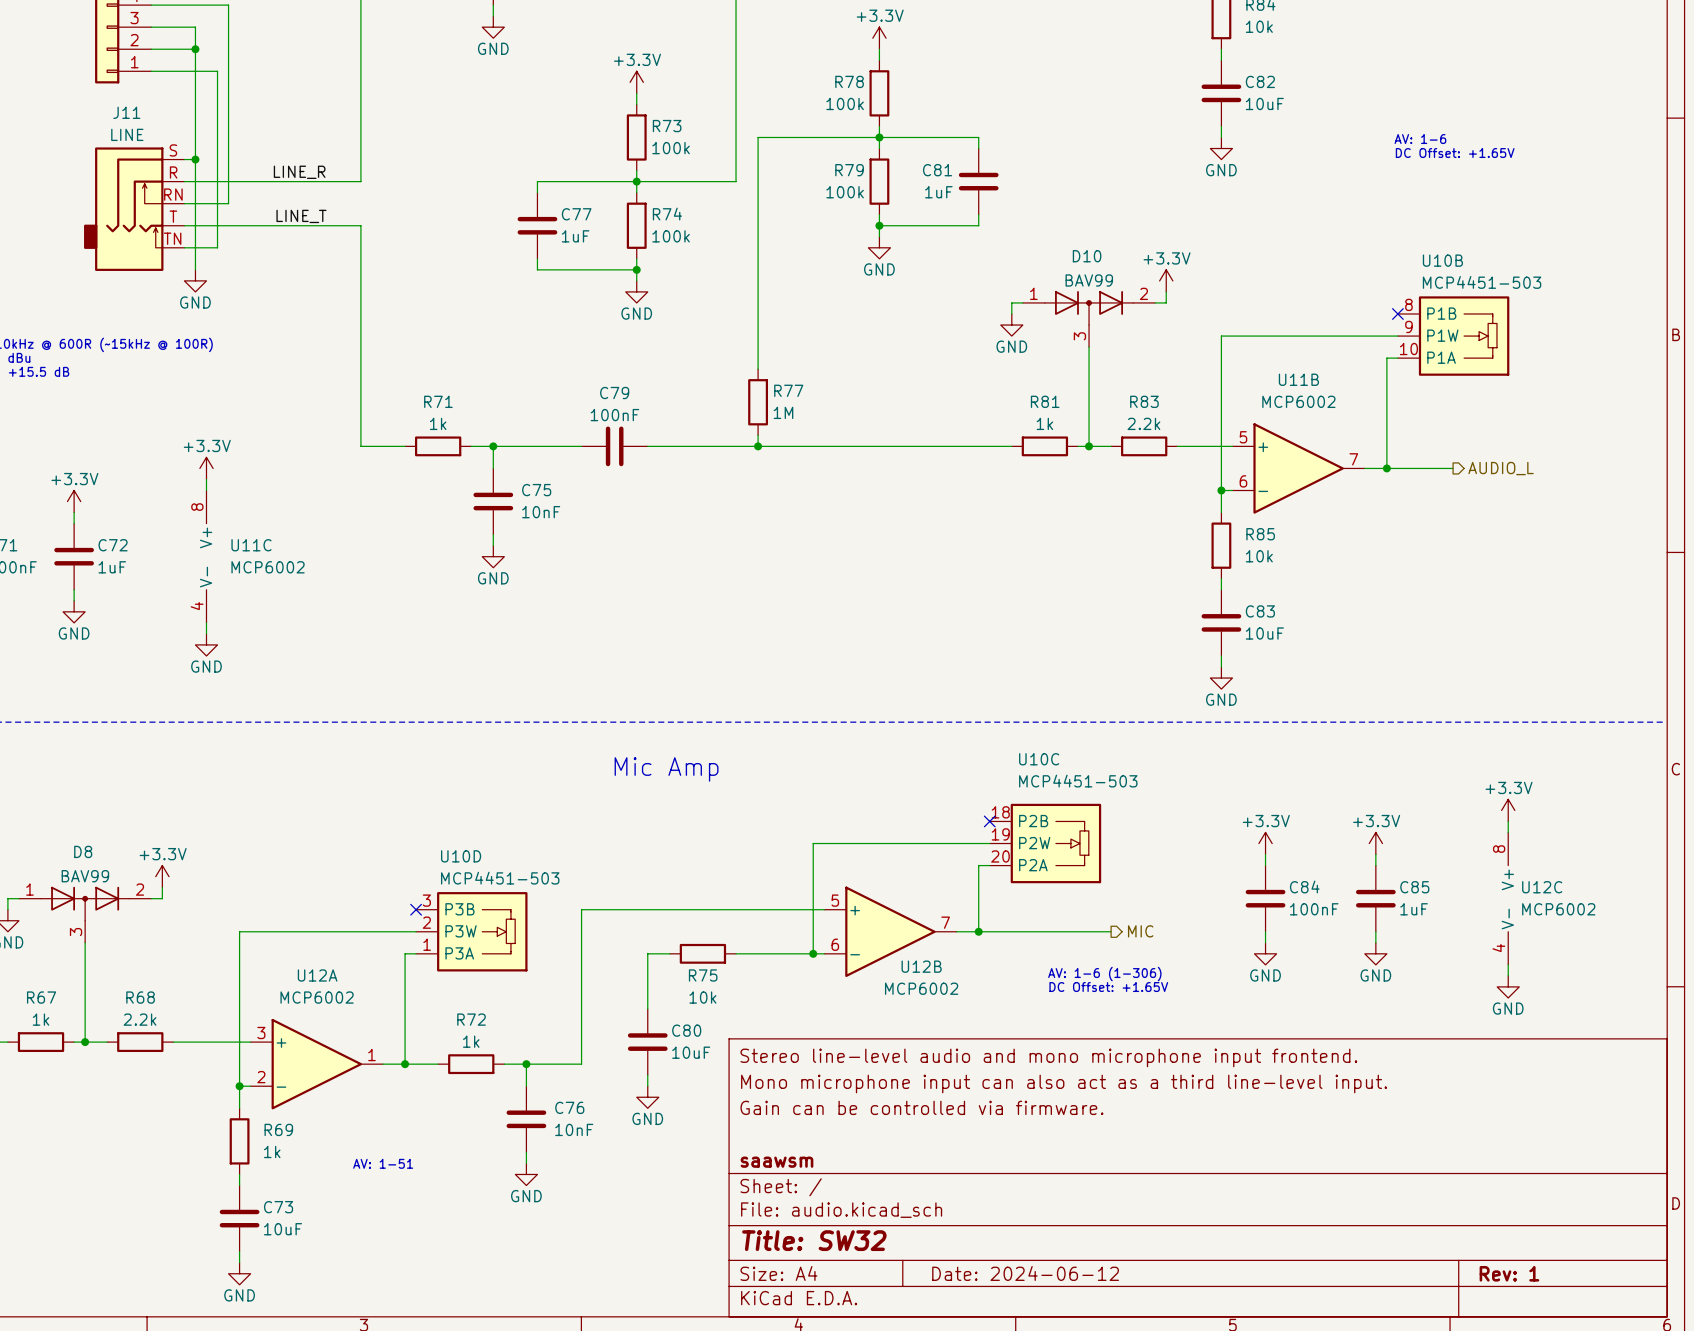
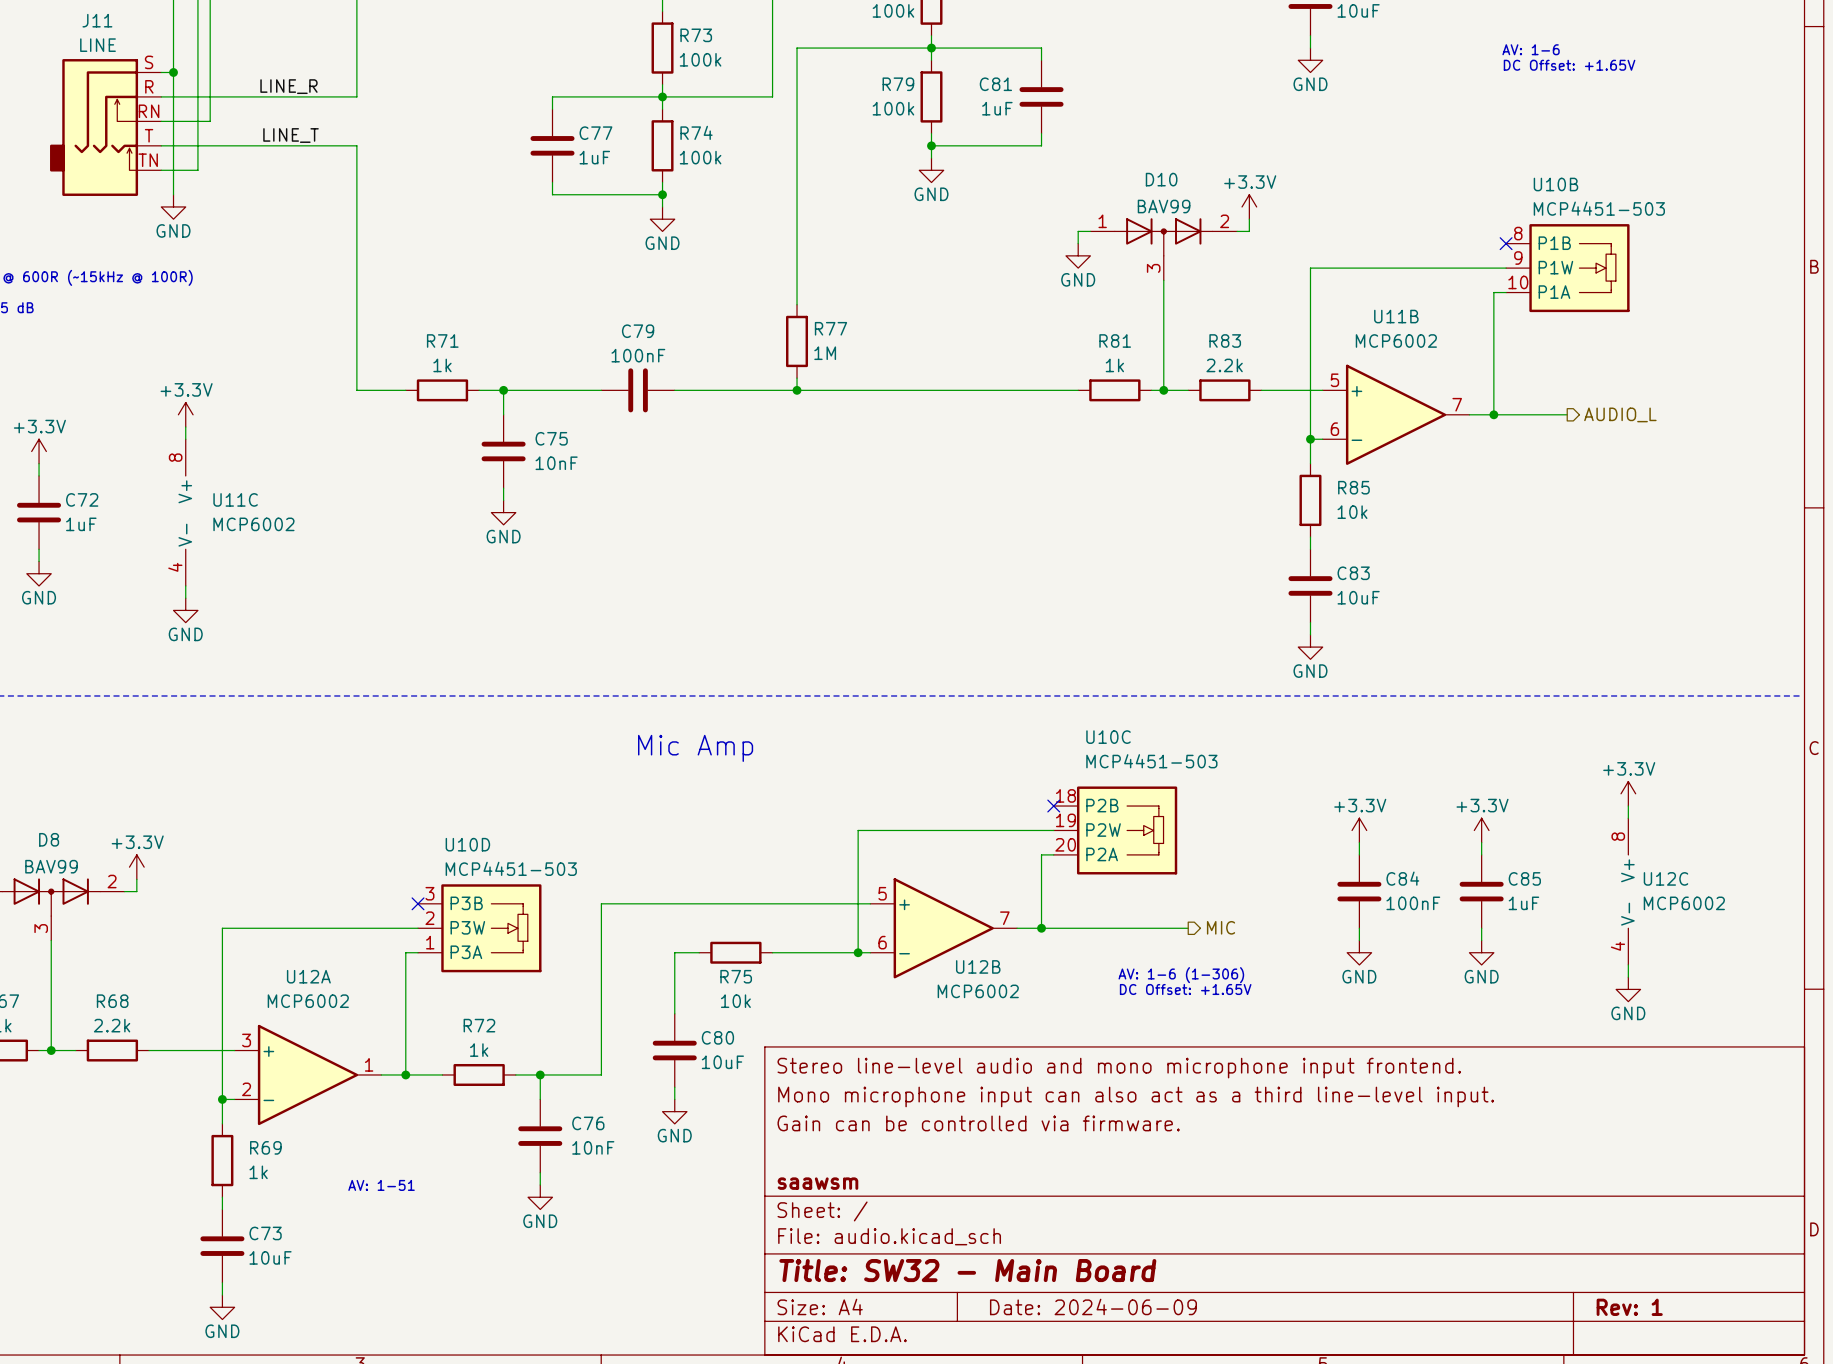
title block: Title: SW32 (814, 1240) -> Title: SW32 - Main Board (967, 1270)
title block: Date: 2024-06-12 (1025, 1273) -> Date: 2024-06-09 (1093, 1306)

